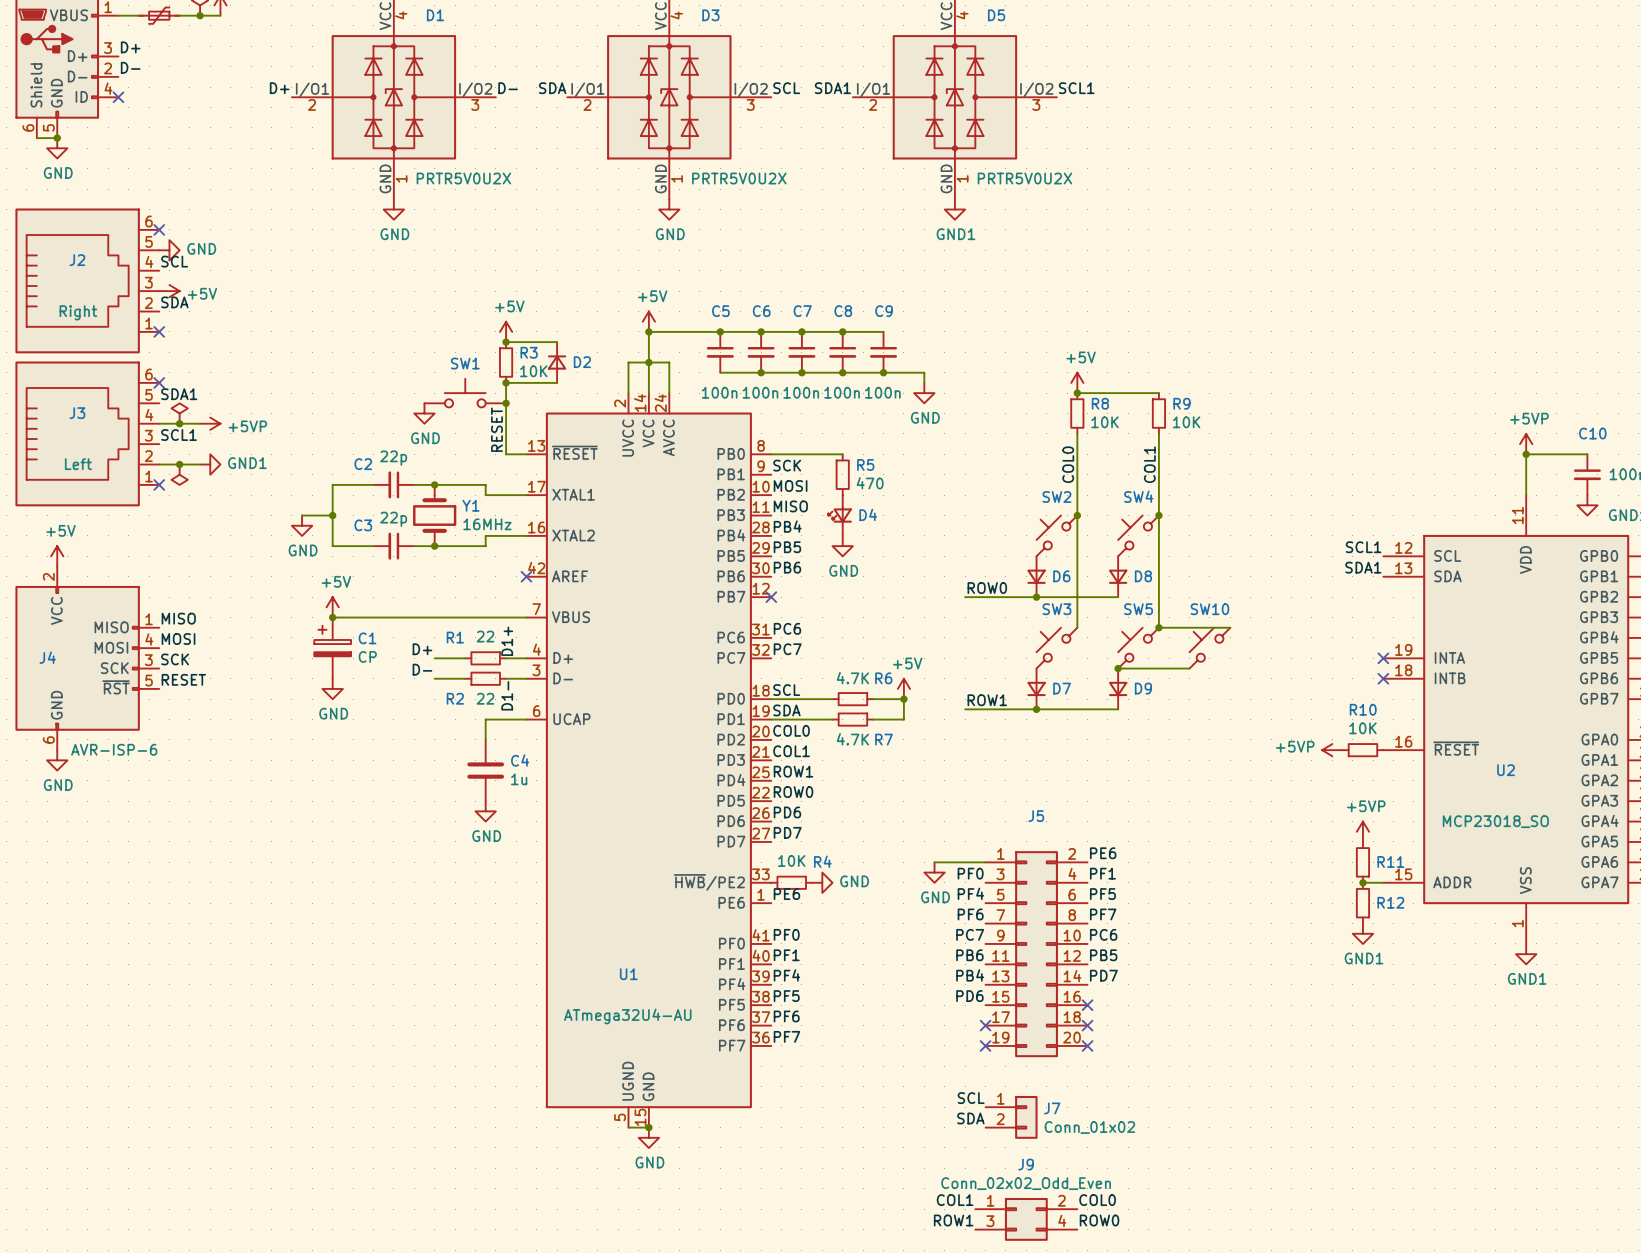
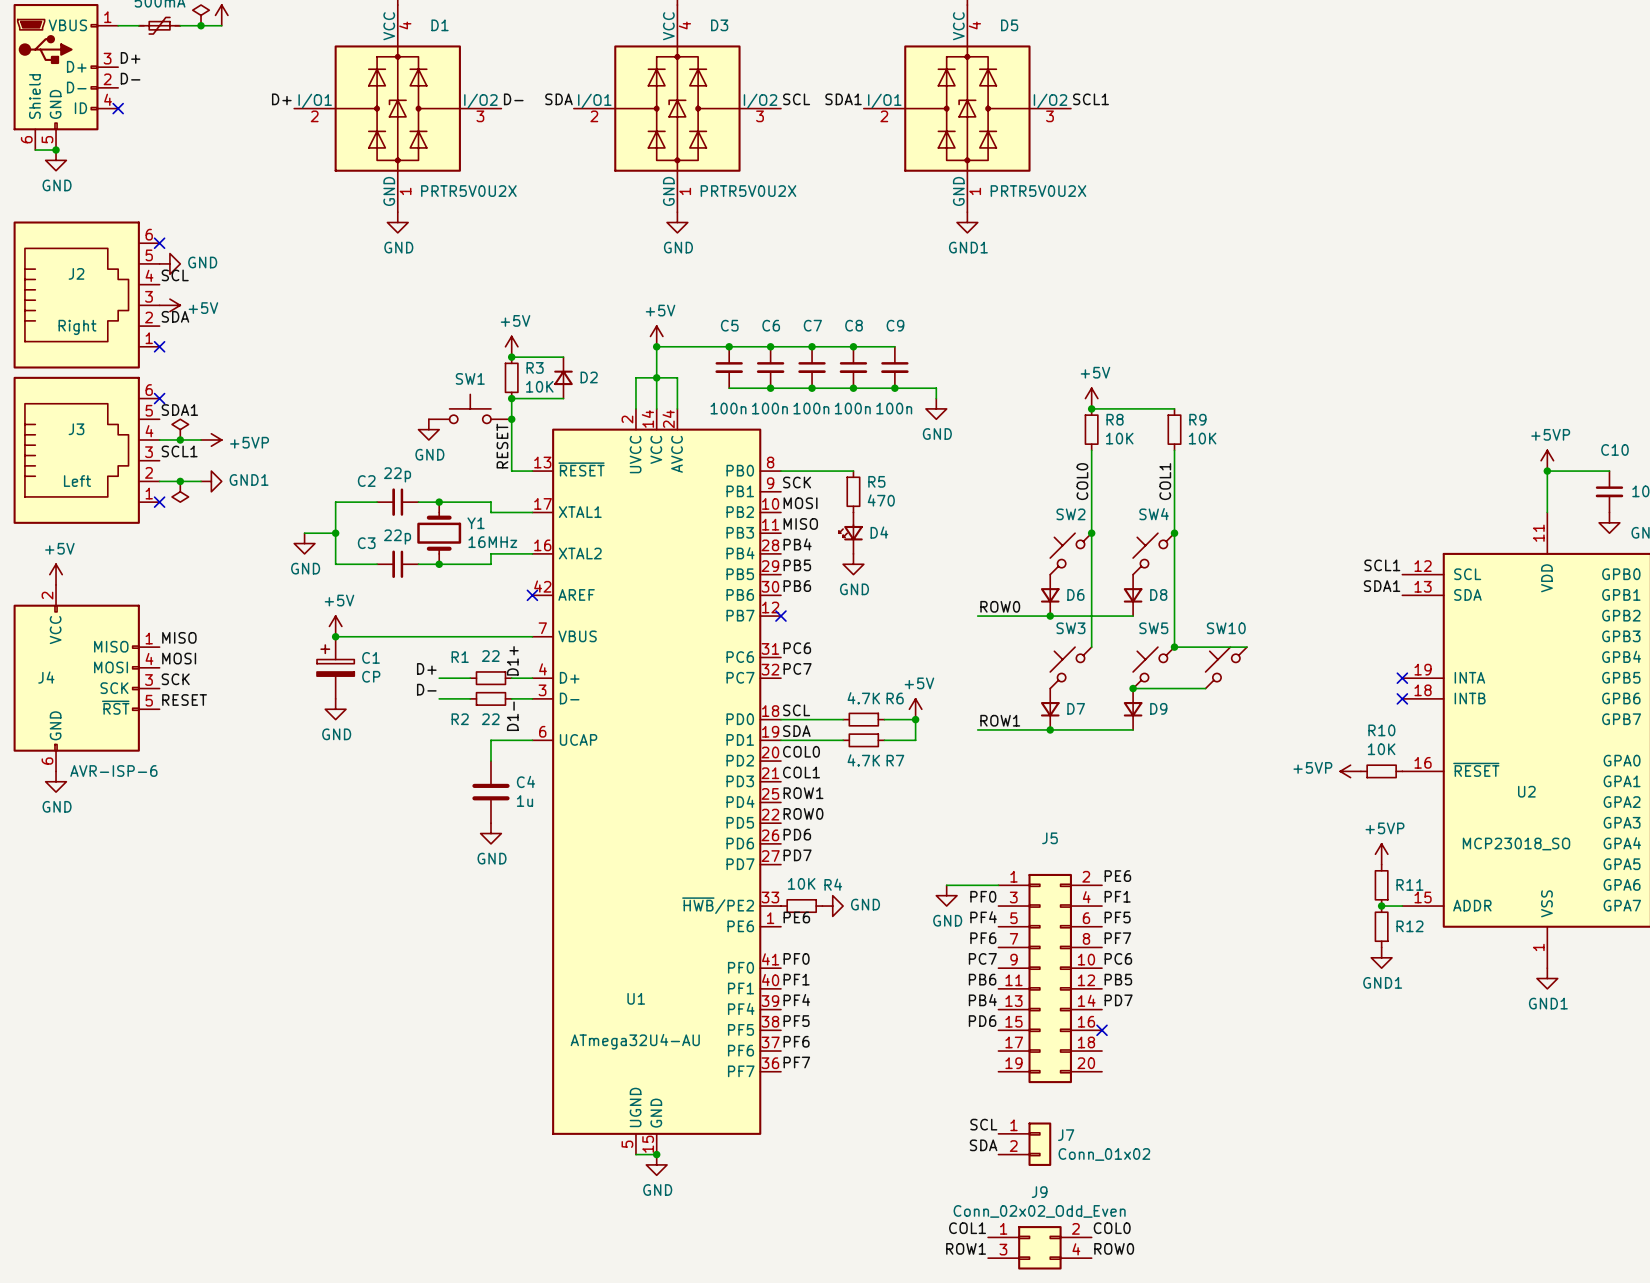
no-connect mark: (985, 1025) -> none
no-connect mark: (1087, 1025) -> none
no-connect mark: (985, 1045) -> none
no-connect mark: (1087, 1045) -> none

